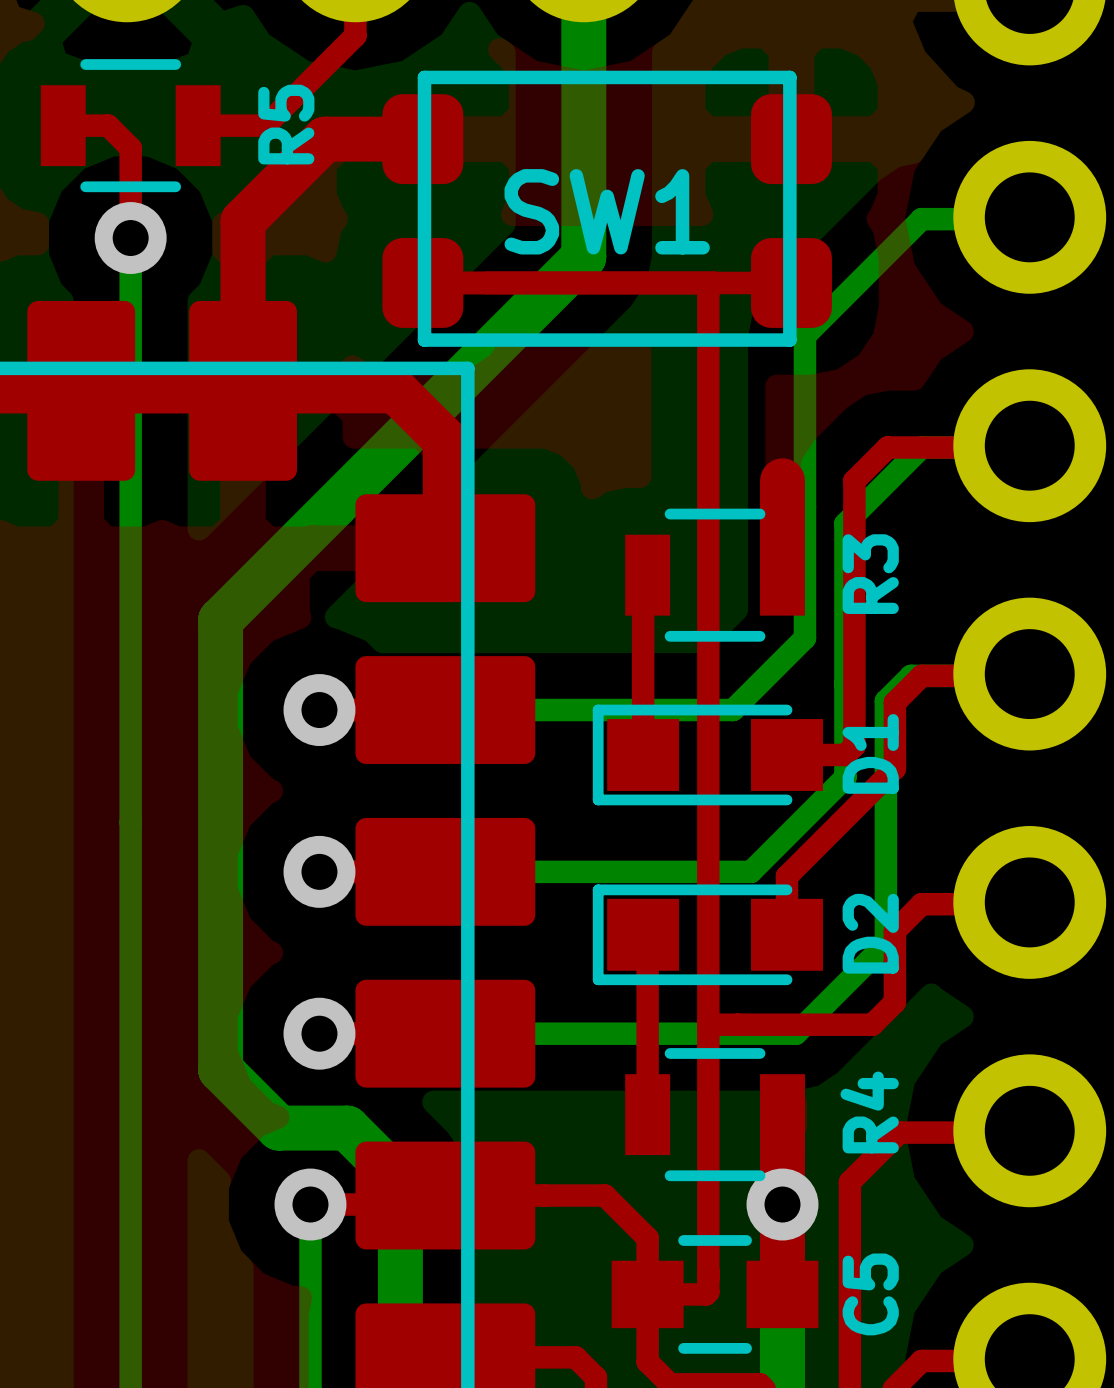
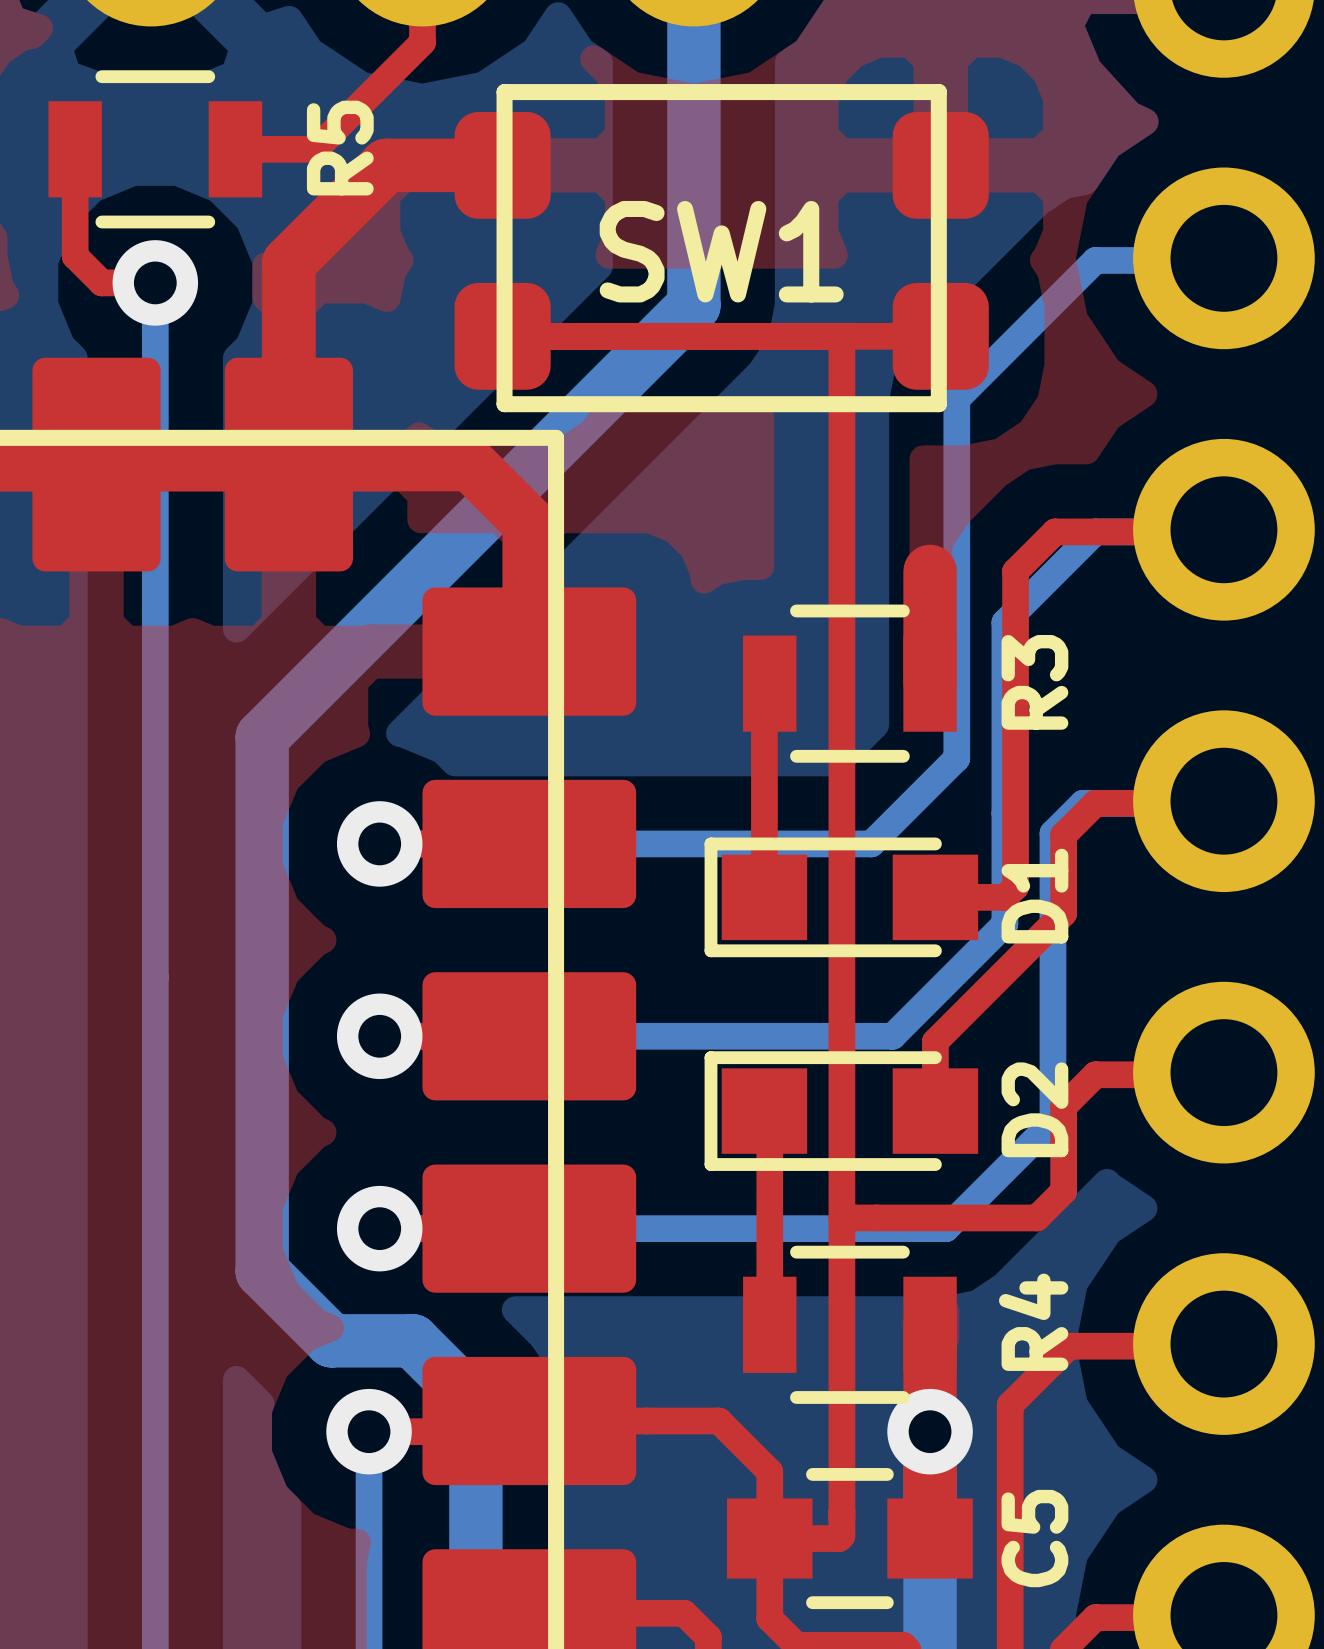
top track: (63, 125) (108, 125) (130, 148) (130, 215) -> (75, 149) (75, 256) (101, 282) (155, 282)

